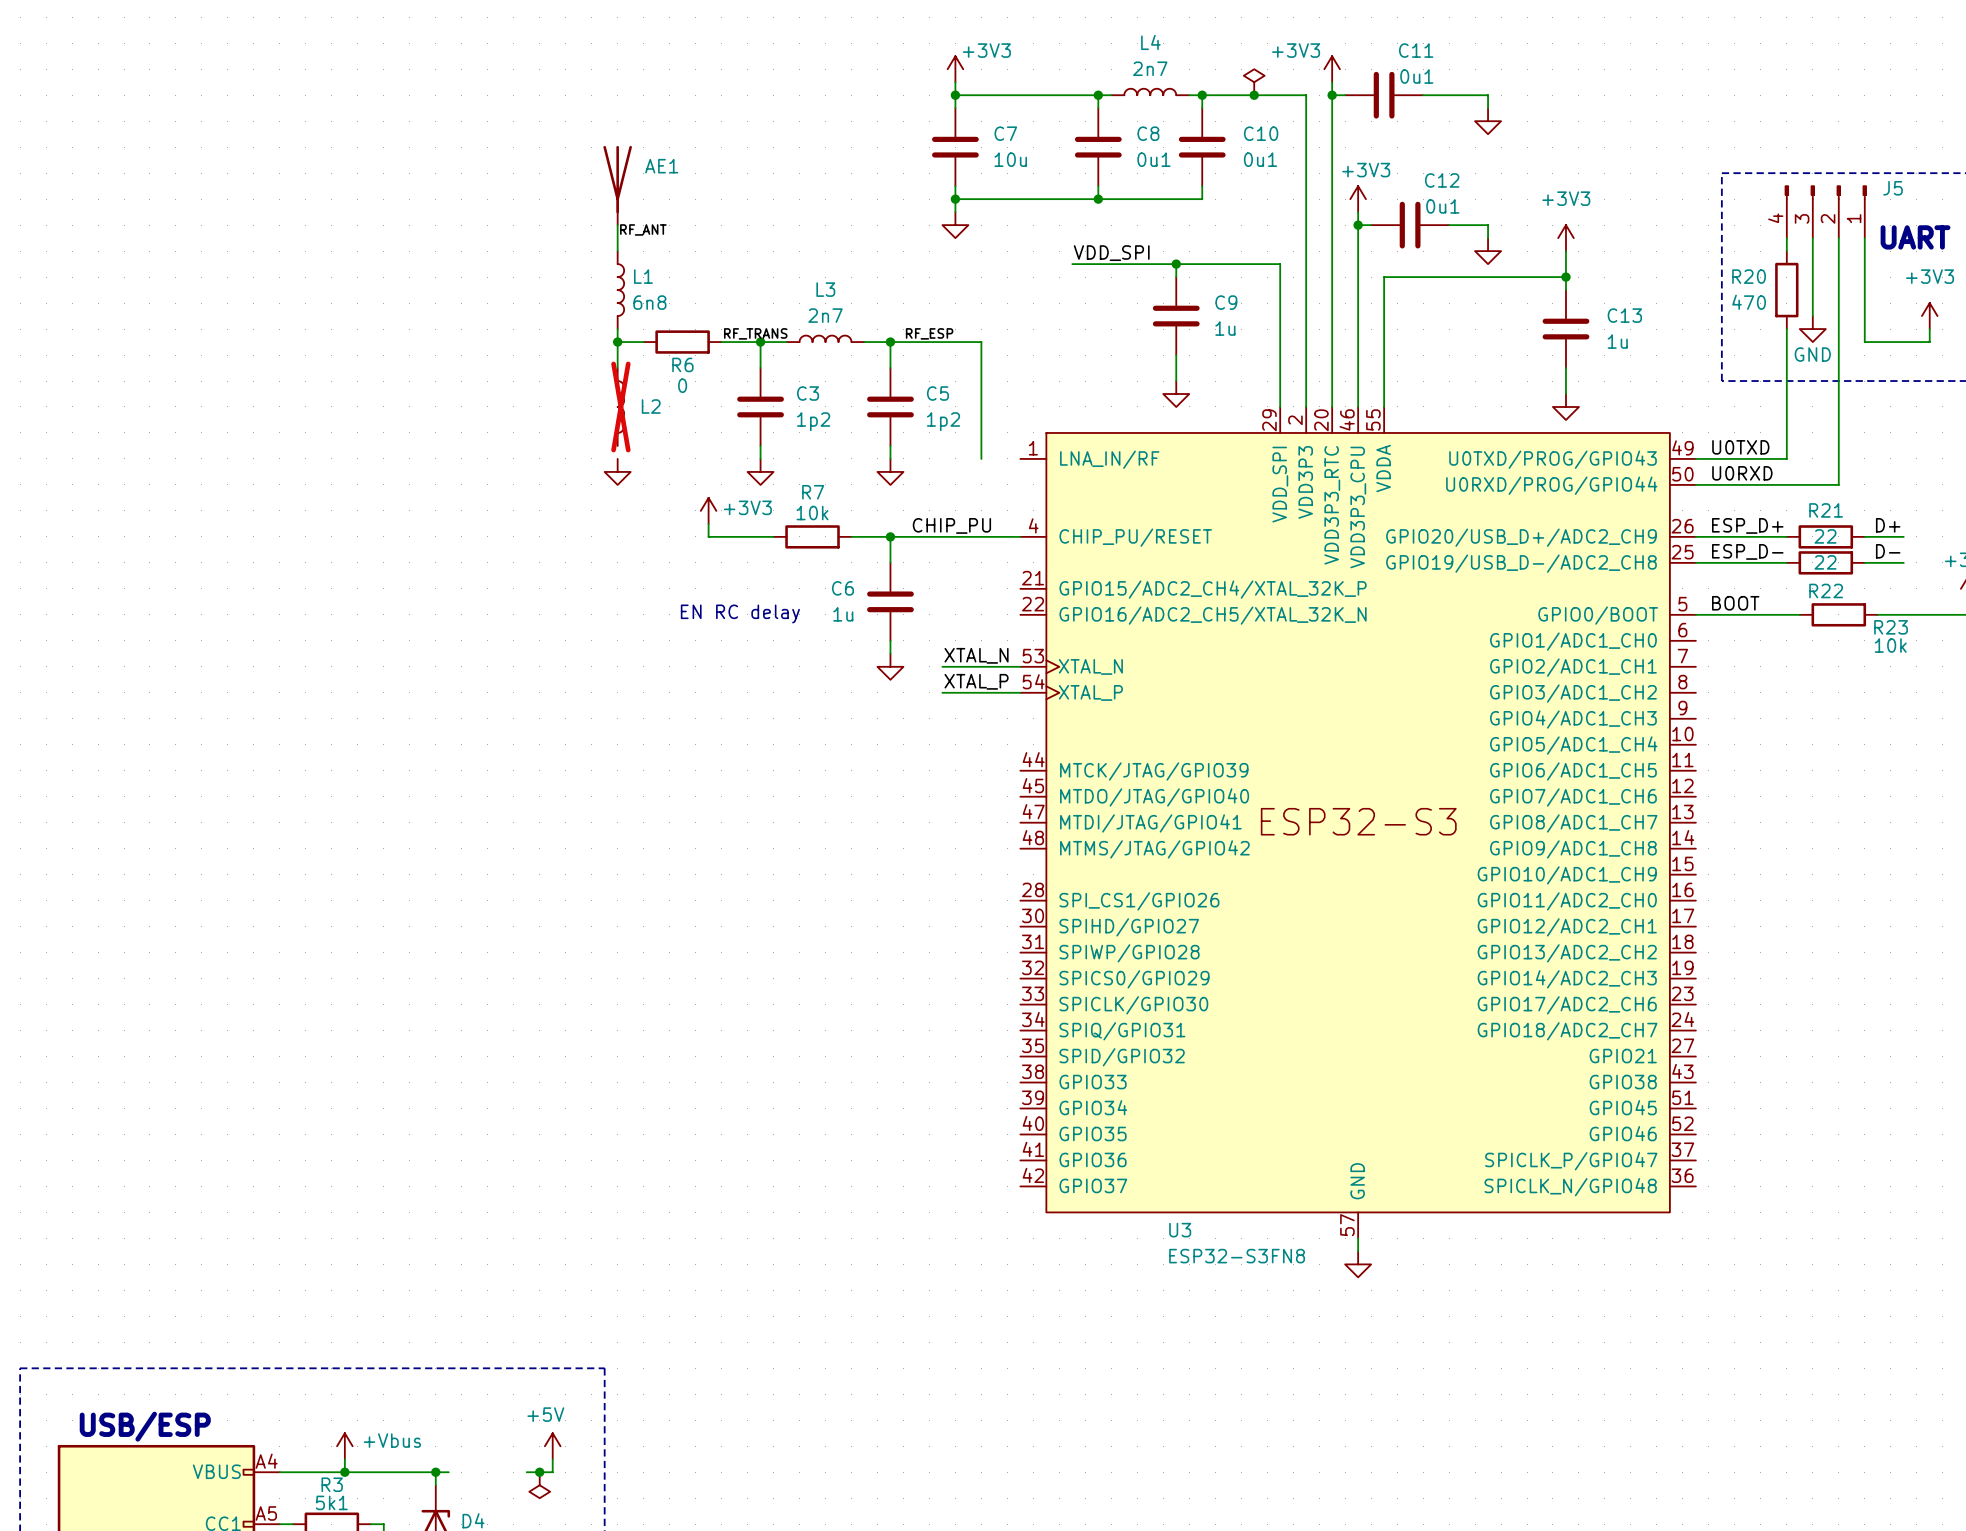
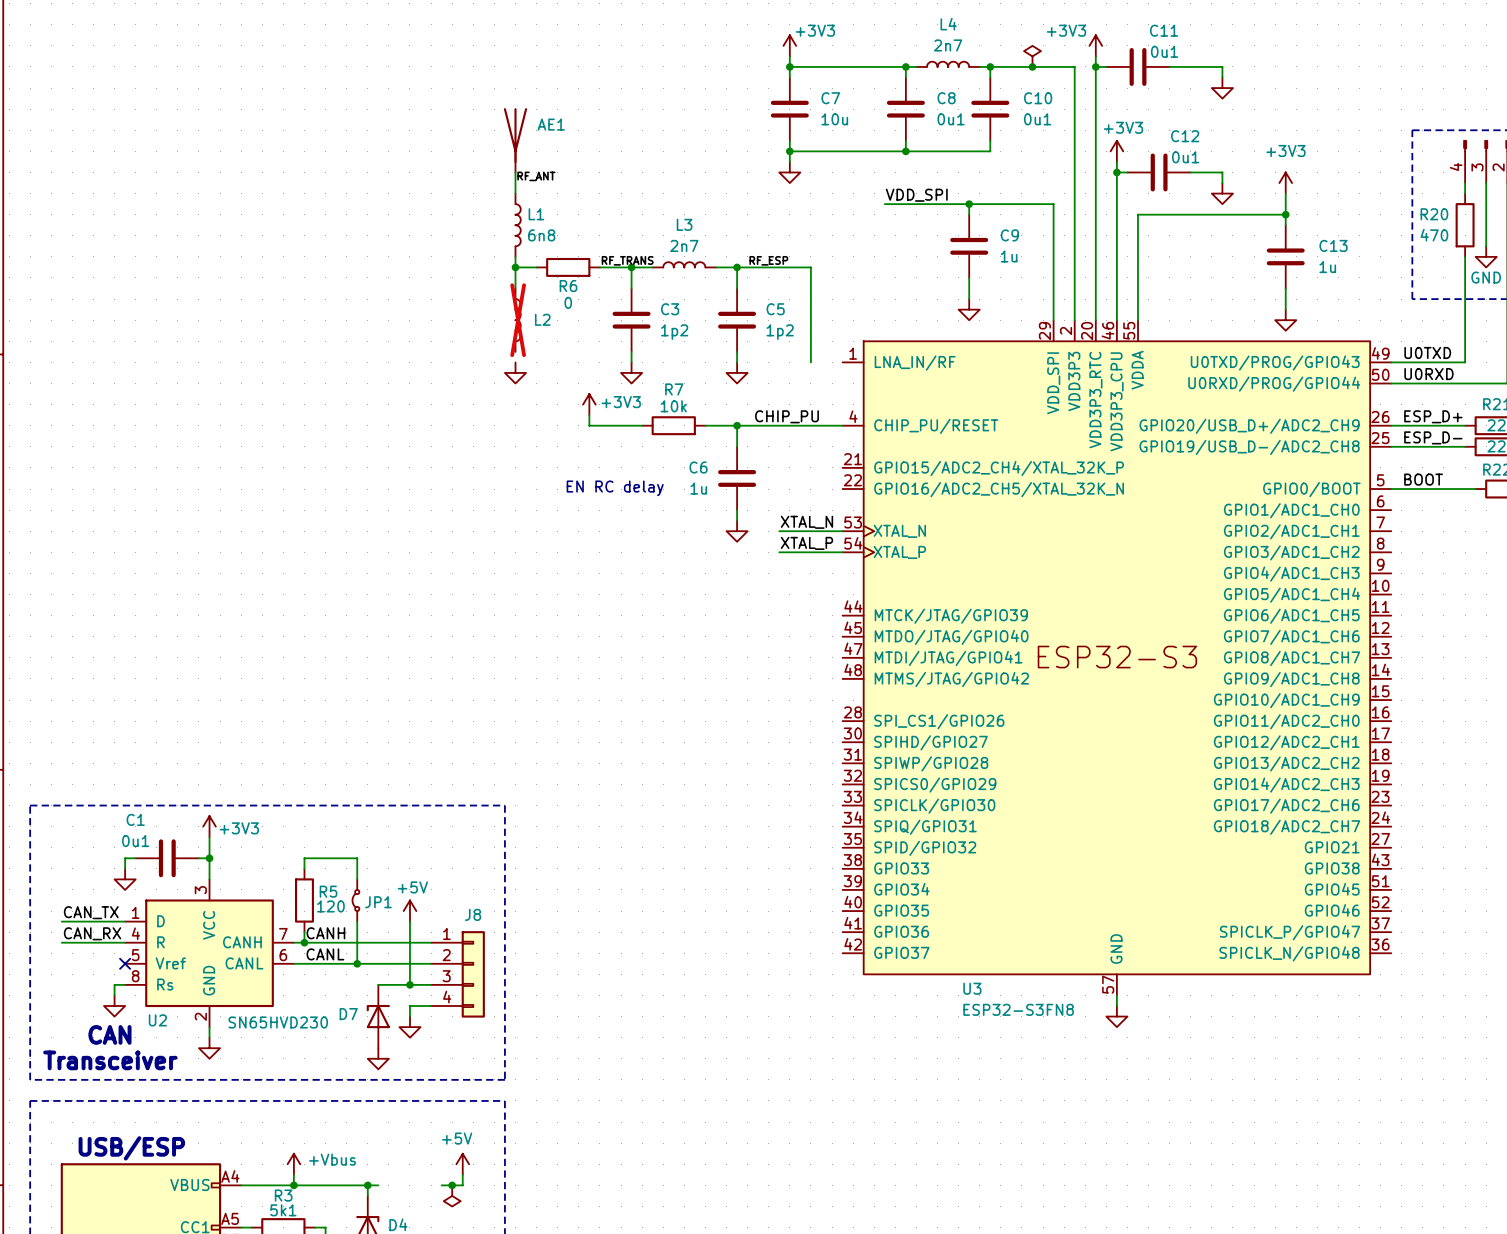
line: none -> (30, 805) (504, 805) (504, 1079) (30, 1079) (30, 805)
power symbol: none -> +3V3 (209, 826)
wire: none -> (209, 837) (209, 879)
wire: none -> (135, 858) (125, 858) (125, 868)
C1: none -> 0u1 (167, 858)
wire: none -> (198, 858) (209, 858)
junction: none -> (209, 858)
wire: none -> (304, 868) (304, 858) (357, 858) (357, 879)
power symbol: none -> (125, 879)
R5: none -> 120 (304, 900)
JP1: none -> (355, 900)
power symbol: none -> +5V (409, 911)
label: none -> CAN_TX (91, 912)
wire: none -> (61, 921) (125, 921)
wire: none -> (357, 921) (357, 963)
wire: none -> (409, 921) (409, 984)
wire: none -> (304, 932) (304, 942)
label: none -> CANH (325, 933)
label: none -> CAN_RX (92, 933)
wire: none -> (61, 942) (125, 942)
wire: none -> (293, 942) (431, 942)
junction: none -> (304, 942)
U2: none -> SN65HVD230 (209, 953)
label: none -> CANL (325, 954)
no-connect mark: none -> (125, 963)
wire: none -> (293, 963) (431, 963)
junction: none -> (357, 963)
J8: none -> (457, 974)
wire: none -> (125, 984) (114, 984) (114, 995)
wire: none -> (378, 984) (431, 984)
junction: none -> (409, 984)
power symbol: none -> (114, 1006)
wire: none -> (431, 1006) (409, 1006) (409, 1016)
D7: none -> (378, 1016)
wire: none -> (209, 1027) (209, 1037)
power symbol: none -> (409, 1027)
text: none -> CAN (109, 1034)
power symbol: none -> (209, 1048)
power symbol: none -> (378, 1058)
text: none -> Transceiver (110, 1060)

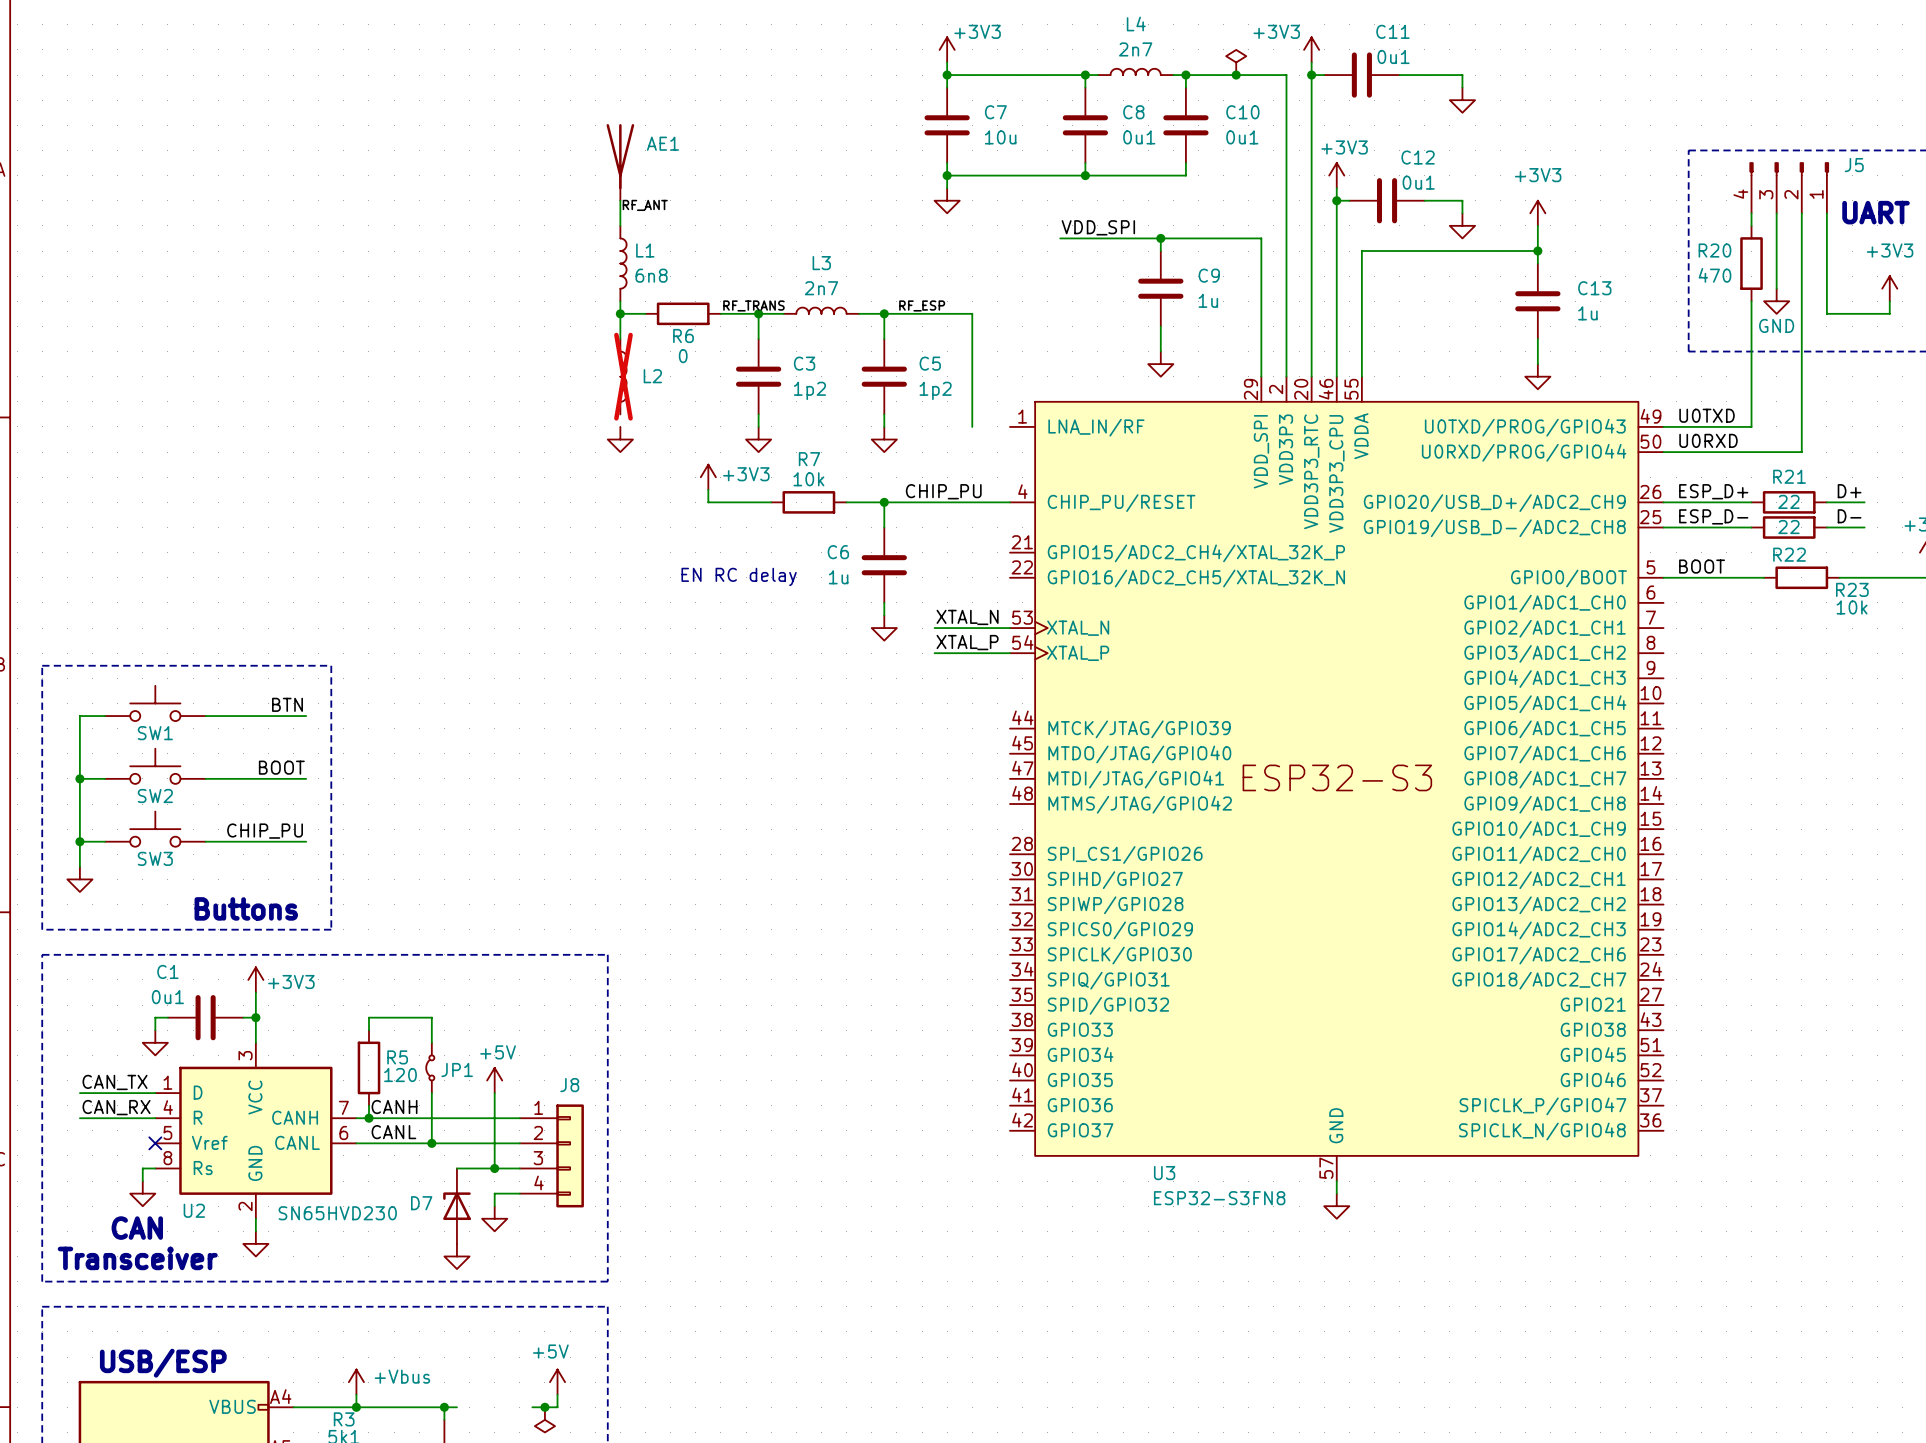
line: none -> (42, 665) (331, 665) (331, 929) (42, 929) (42, 665)
SW1: none -> (155, 703)
label: none -> BTN (287, 704)
wire: none -> (105, 716) (79, 716) (79, 866)
wire: none -> (205, 716) (306, 716)
SW2: none -> (155, 766)
label: none -> BOOT (281, 767)
wire: none -> (79, 778) (105, 778)
junction: none -> (79, 778)
wire: none -> (205, 778) (306, 778)
SW3: none -> (155, 829)
label: none -> CHIP_PU (265, 831)
wire: none -> (79, 841) (105, 841)
junction: none -> (79, 841)
wire: none -> (205, 841) (306, 841)
power symbol: none -> (79, 879)
text: none -> Buttons (246, 908)

